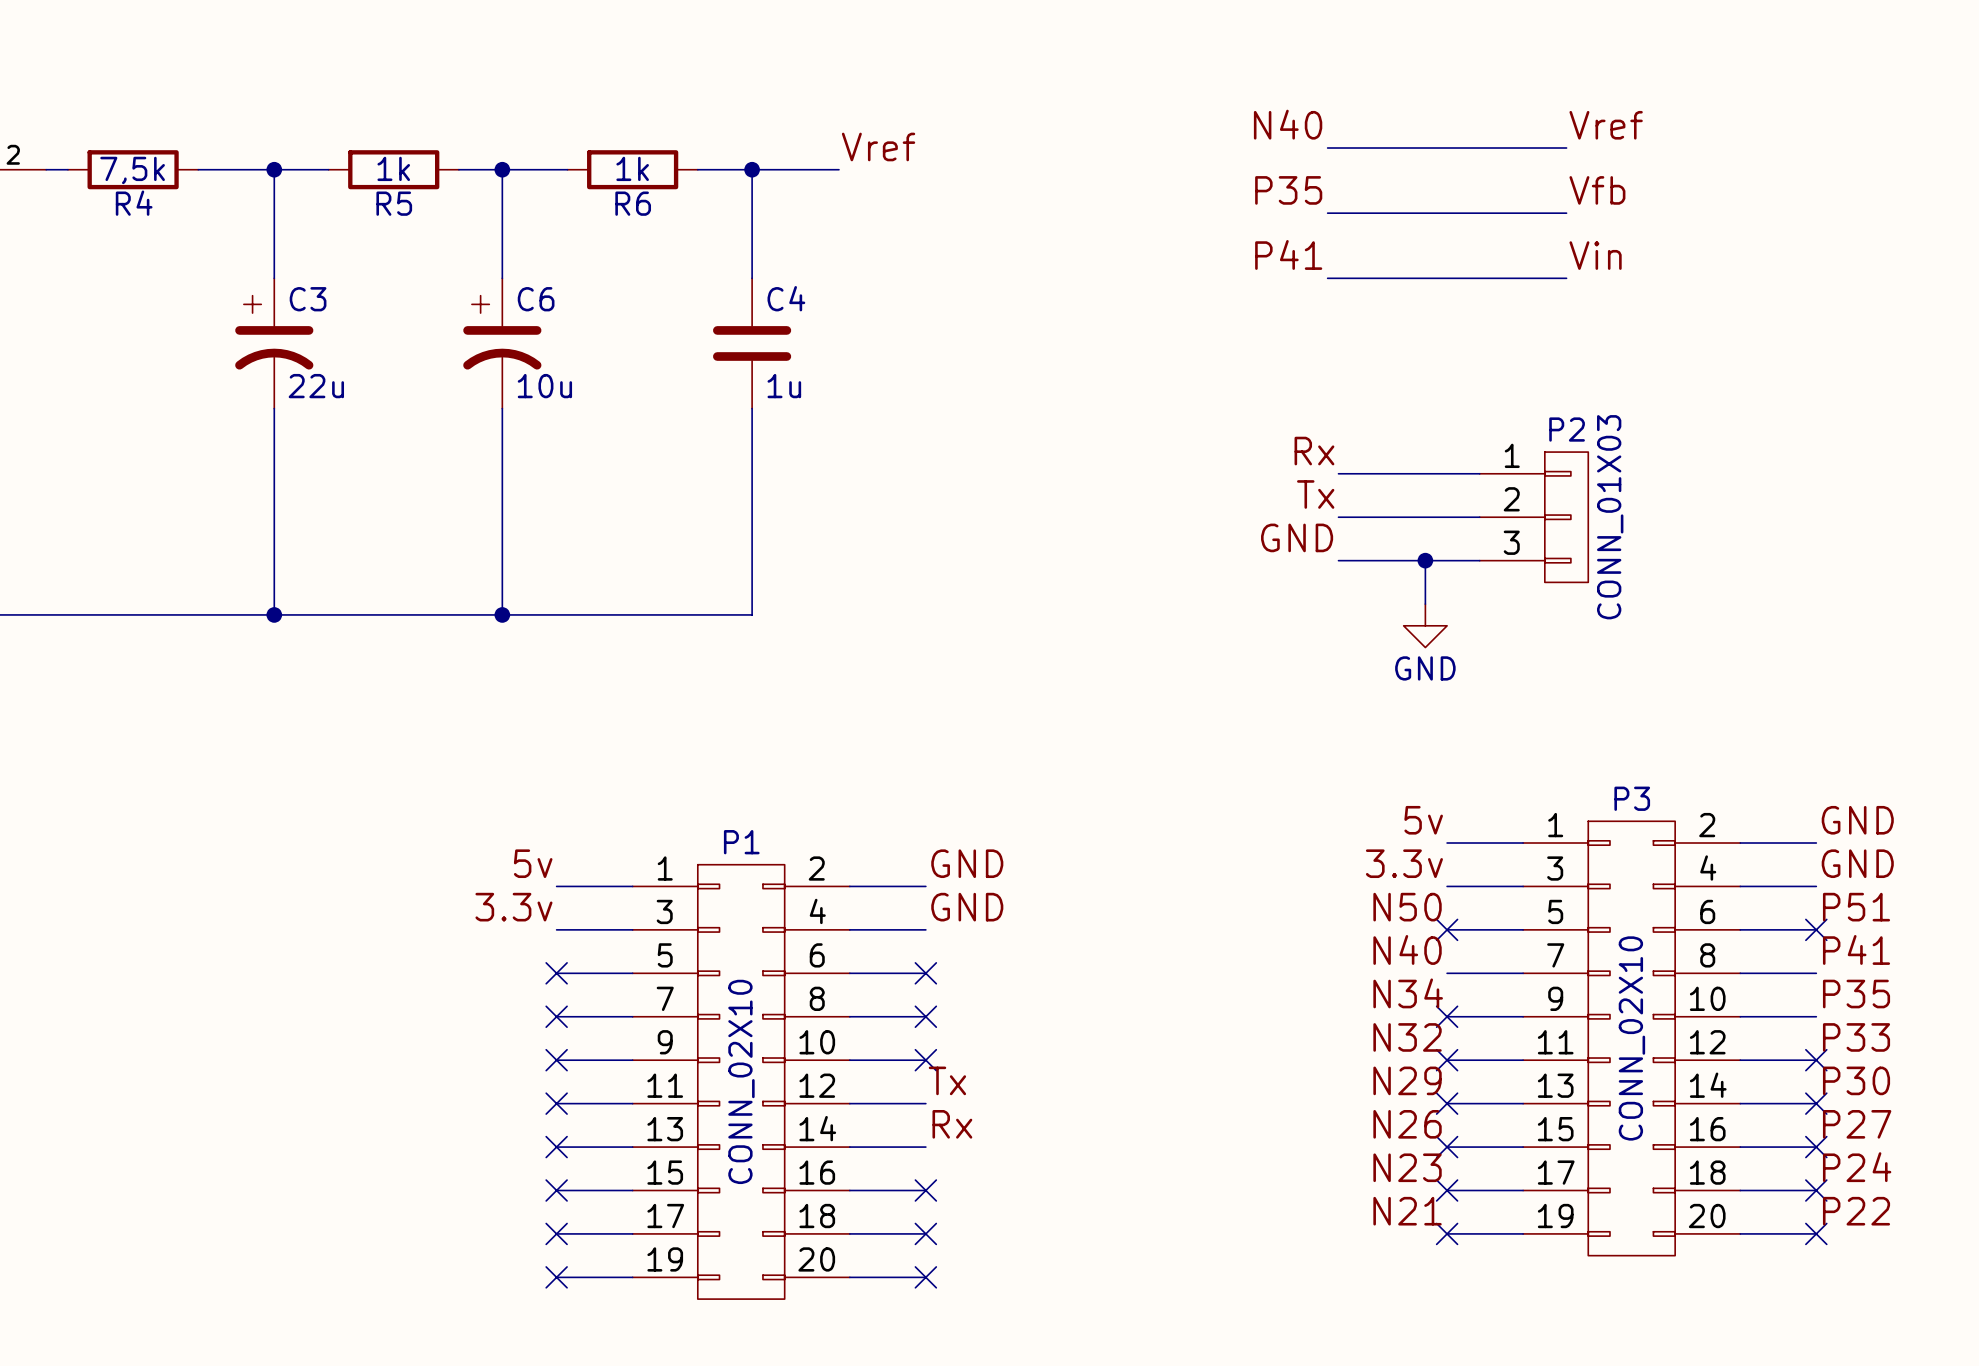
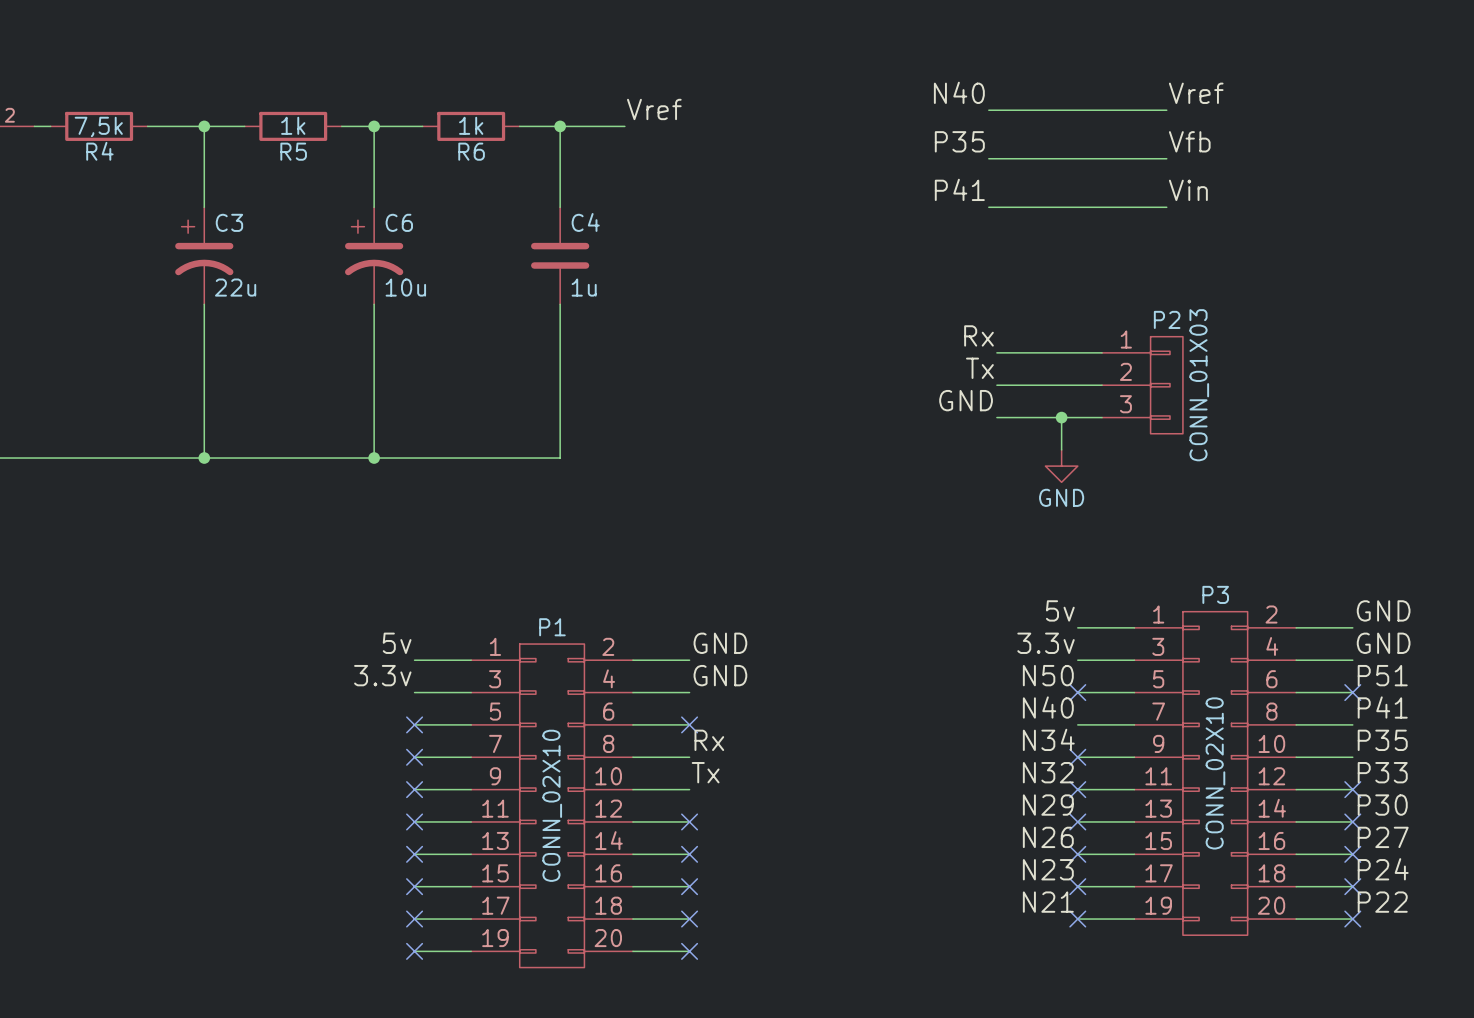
no-connect mark: (925, 1016) -> none
no-connect mark: (925, 1060) -> none
label position: Tx (947, 1080) -> Tx (705, 772)
no-connect mark: none -> (689, 821)
label position: Rx (952, 1124) -> Rx (709, 740)
no-connect mark: none -> (689, 854)

